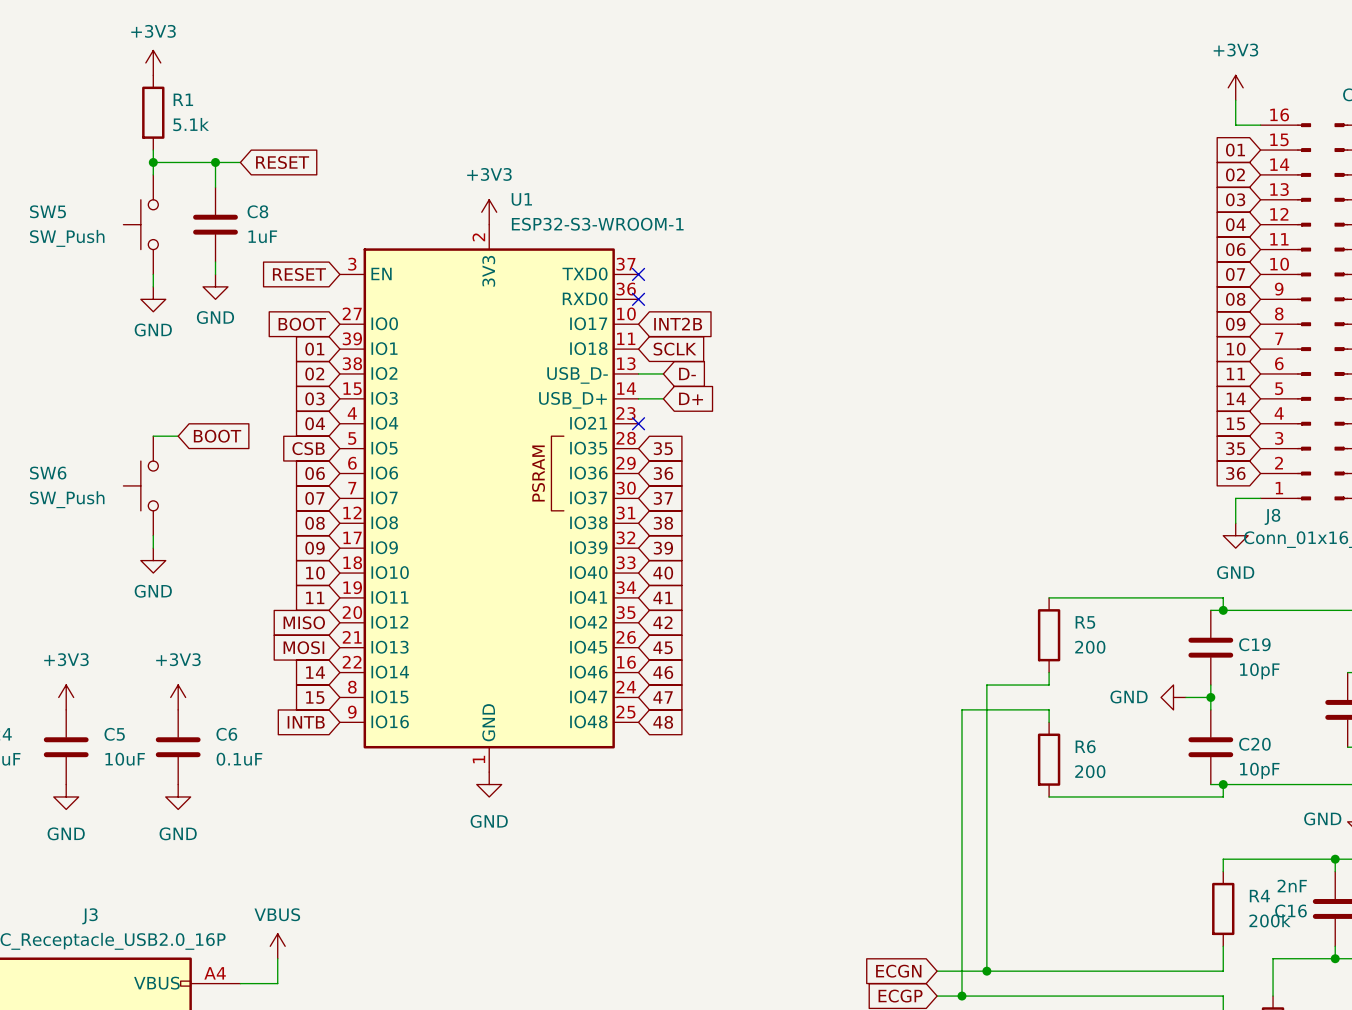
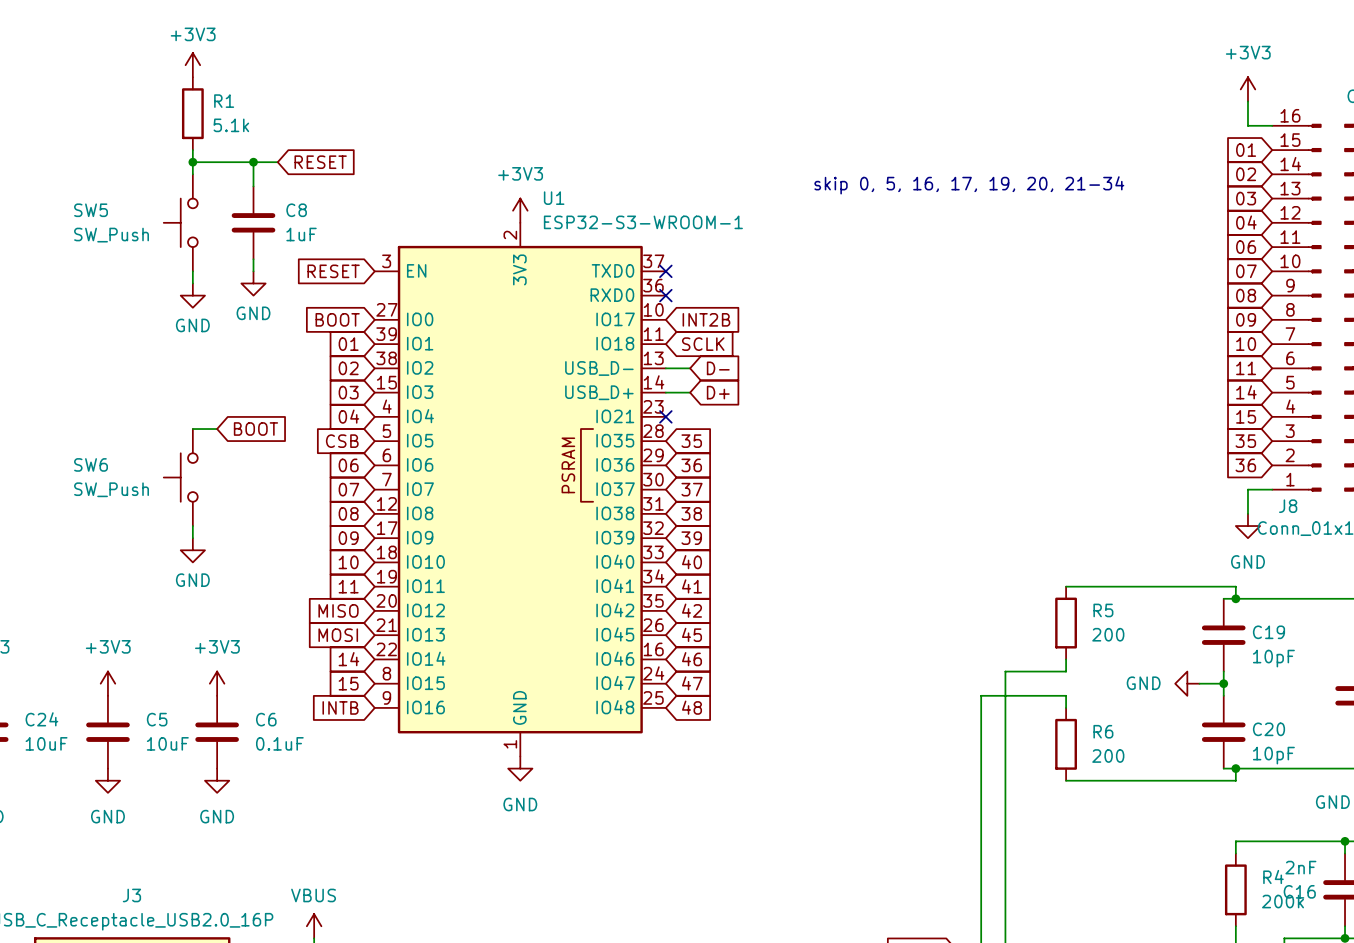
text: none -> skip 0, 5, 16, 17, 19, 20, 21-34 (969, 185)

